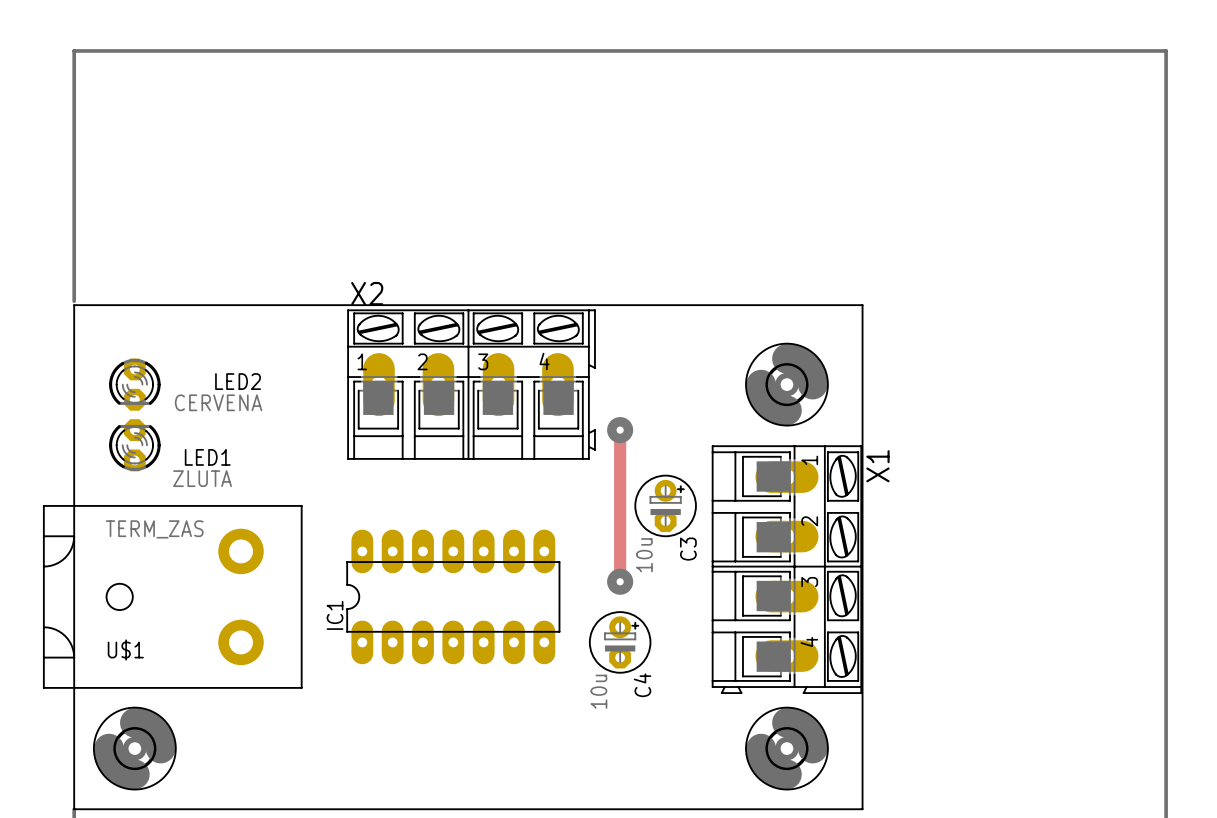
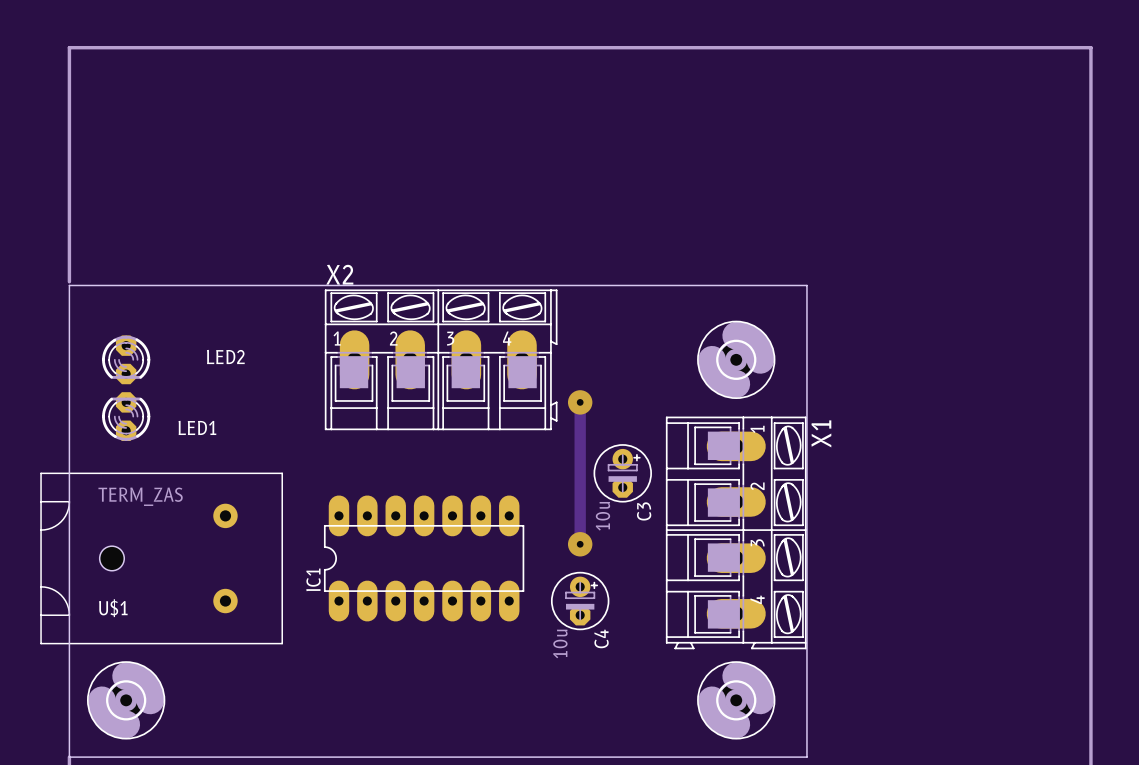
LED2 value: CERVENA (218, 402) -> none
LED1 value: ZLUTA (202, 478) -> none
U$1 footprint: [43, 505, 303, 689] -> [40, 472, 283, 645]

